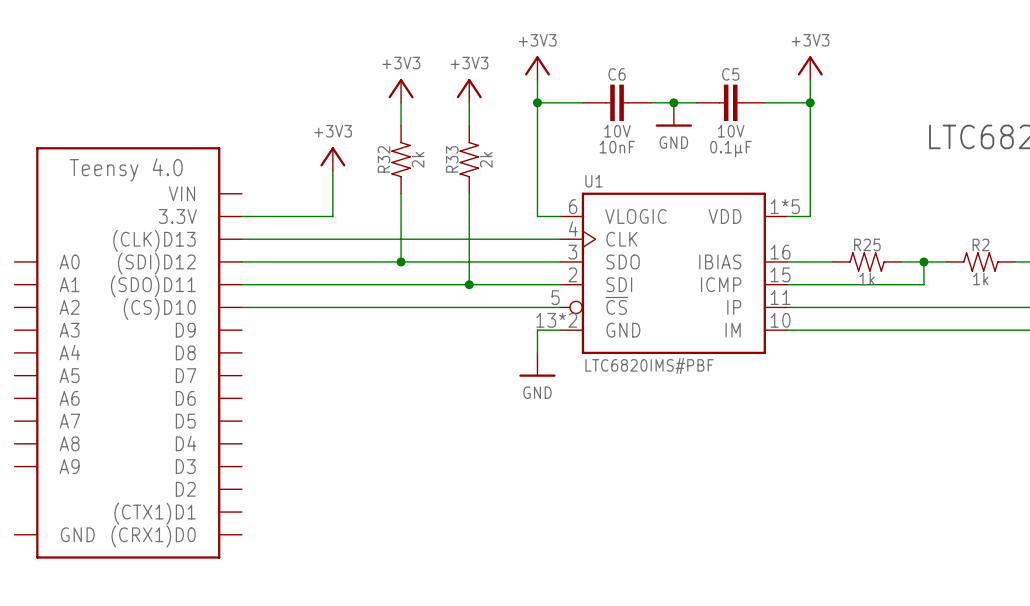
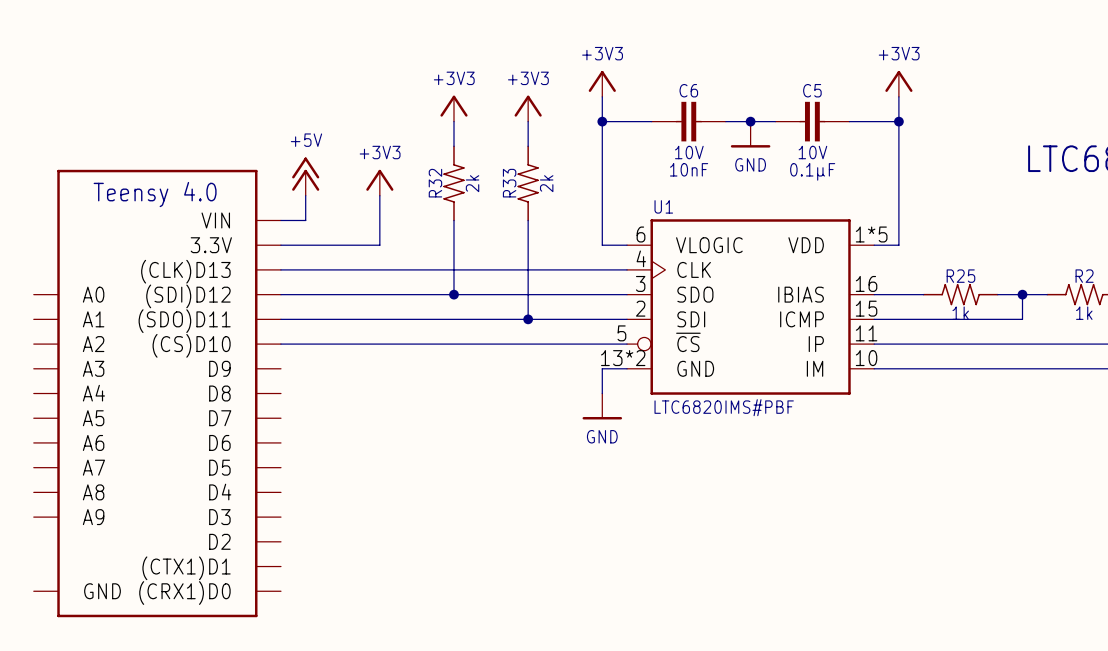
power symbol: none -> +5V (305, 176)
wire: none -> (305, 195) (305, 220) (280, 220)

